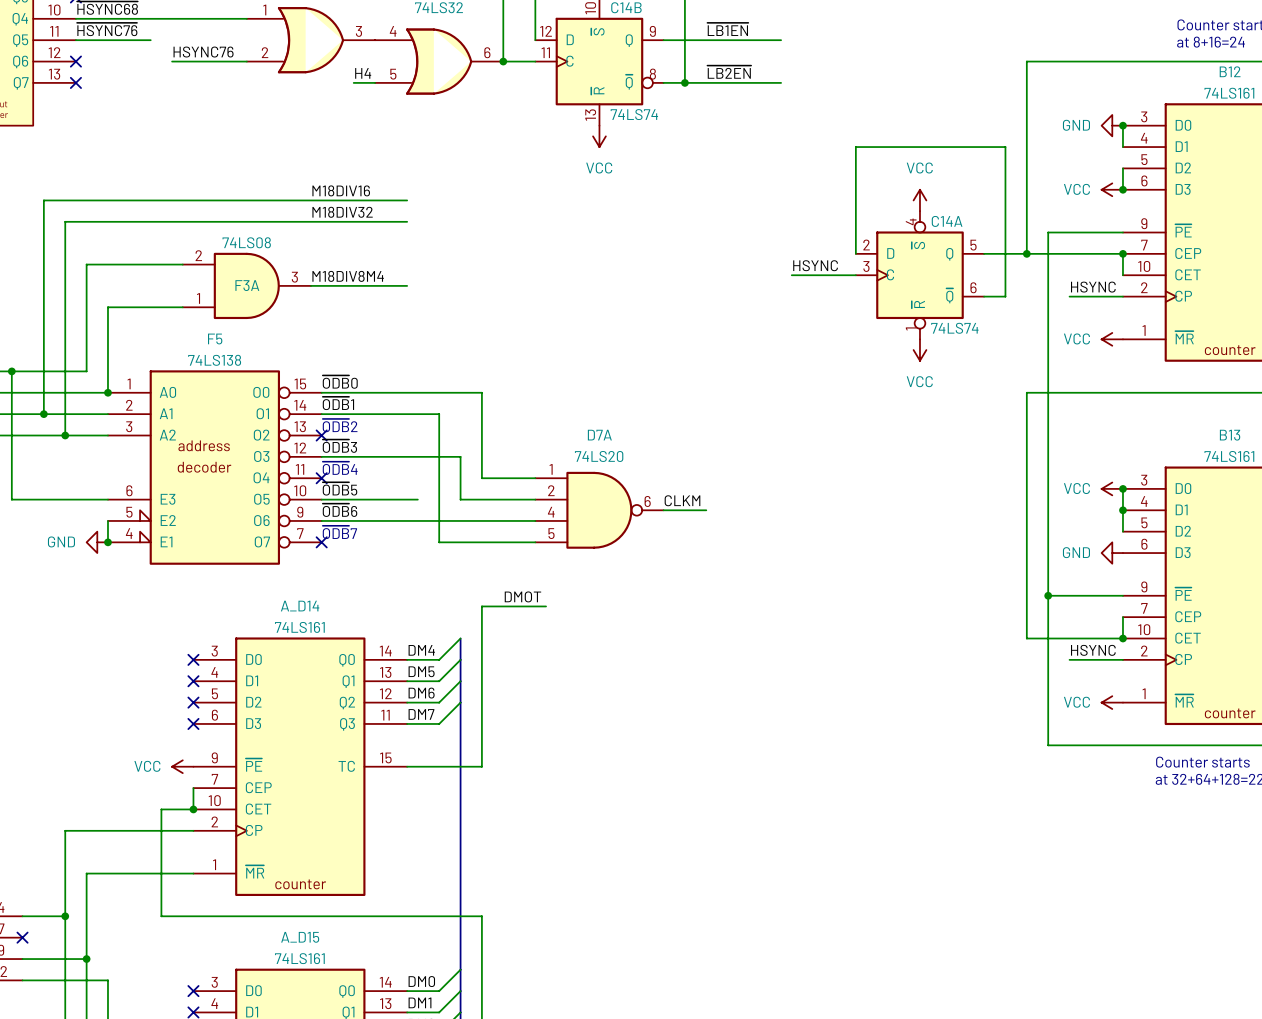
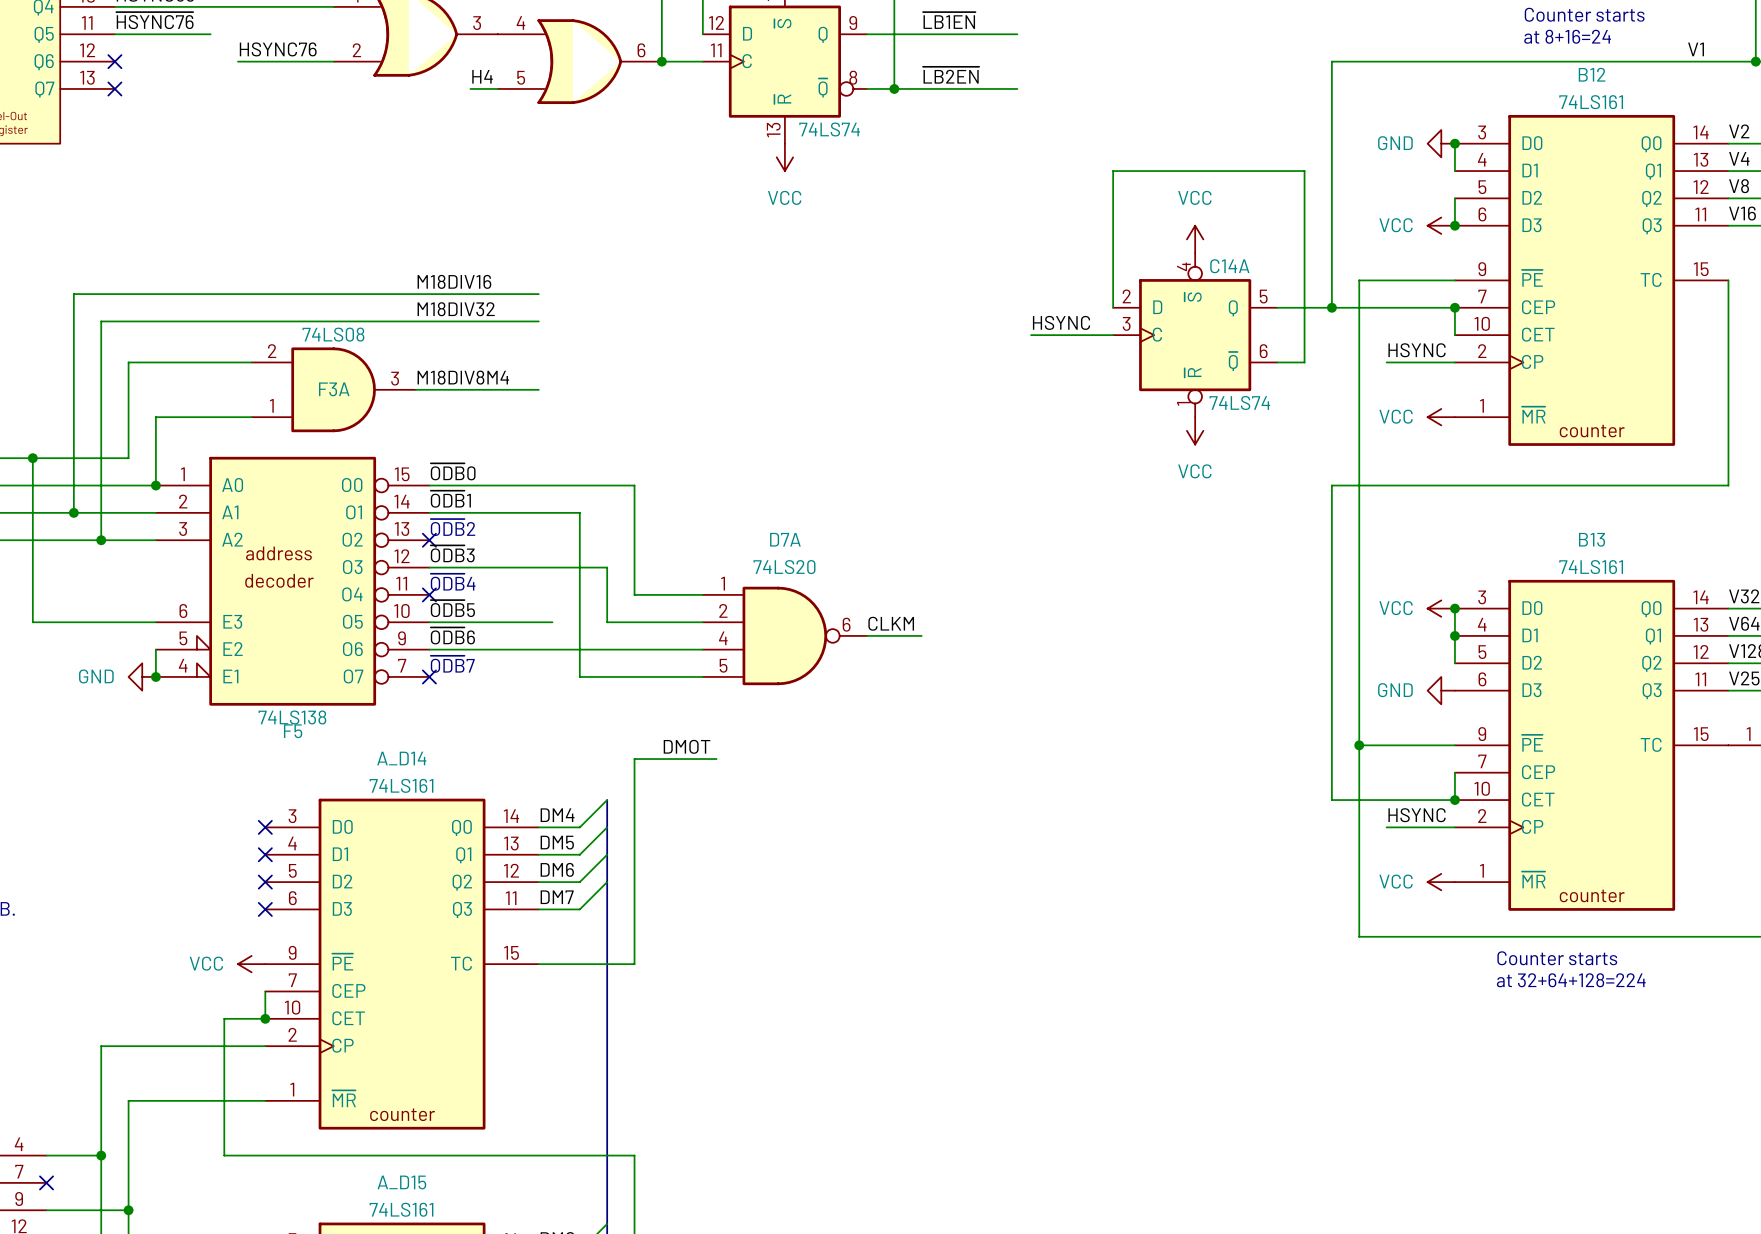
label position: M18DIV16 (341, 190) -> M18DIV16 (454, 281)
wire: (407, 200) (43, 200) (43, 243) -> (538, 294) (73, 294)
label position: M18DIV32 (342, 212) -> M18DIV32 (456, 309)
wire: (407, 221) (65, 221) (65, 264) -> none
wire: (86, 264) (86, 296) -> (128, 321) (101, 321)
wire: none -> (251, 321) (538, 321)
label position: M18DIV8M4 (348, 276) -> M18DIV8M4 (463, 377)
F3A position: (246, 285) -> (333, 389)
wire: (310, 285) (407, 285) -> (415, 389) (538, 389)
wire: none -> (128, 362) (251, 362)
wire: (182, 307) (107, 307) (107, 339) -> (251, 417) (155, 417)
F5 name position: F5 (215, 339) -> F5 (293, 731)
F5 value position: 74LS138 (214, 360) -> 74LS138 (292, 717)

